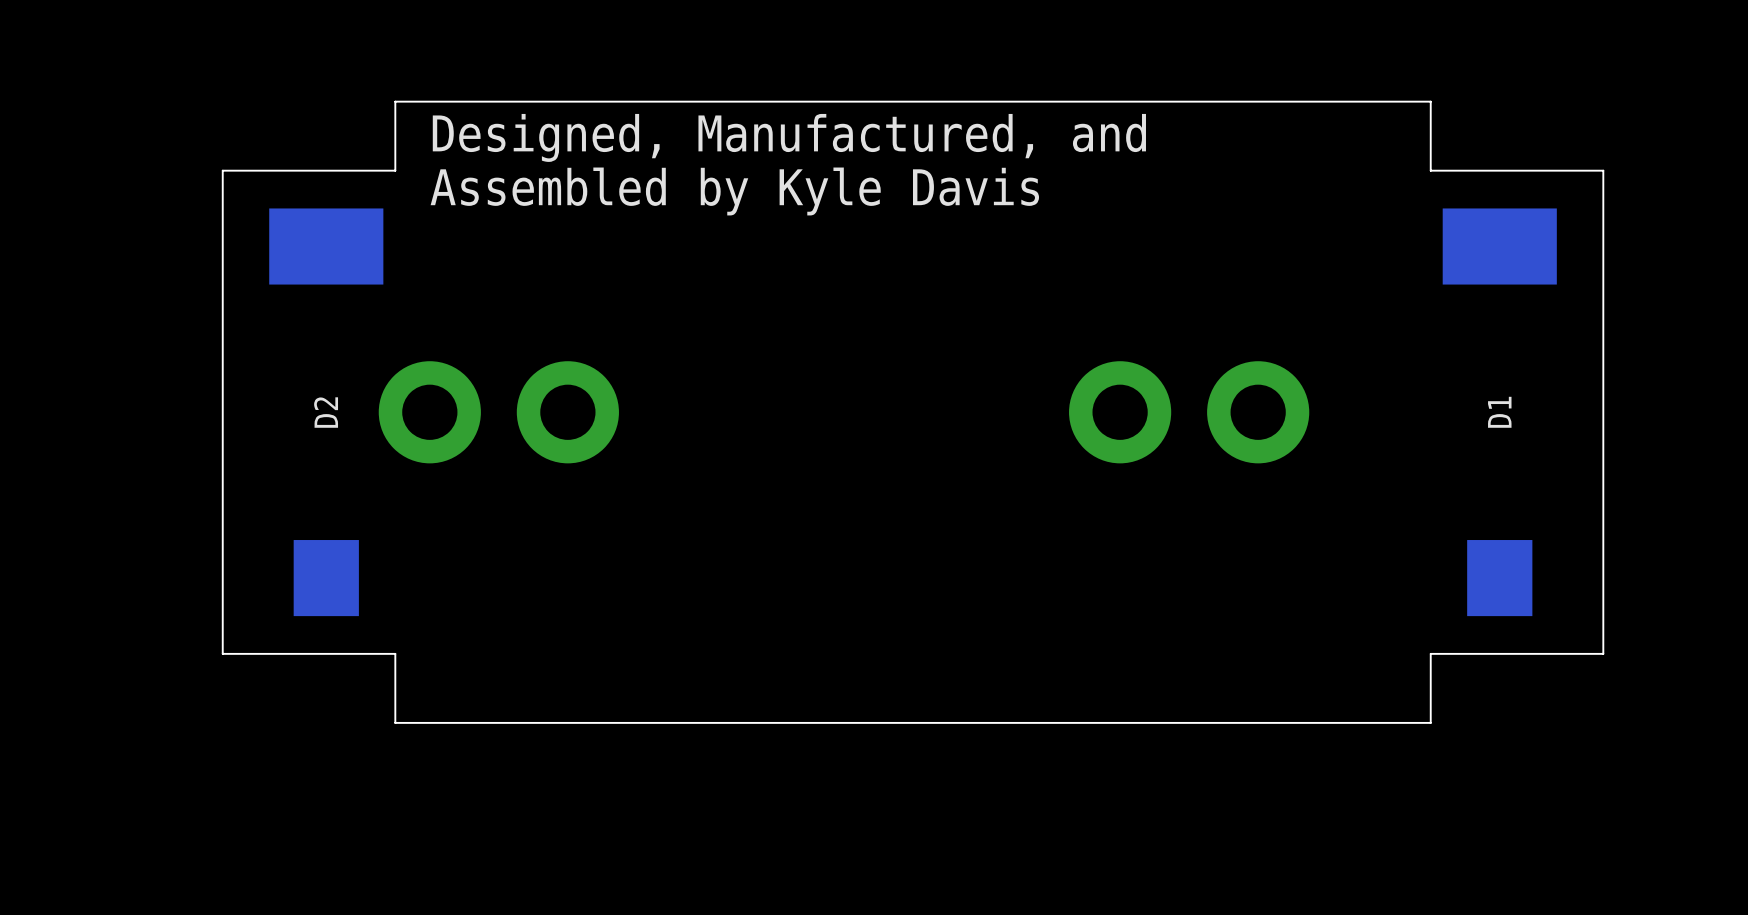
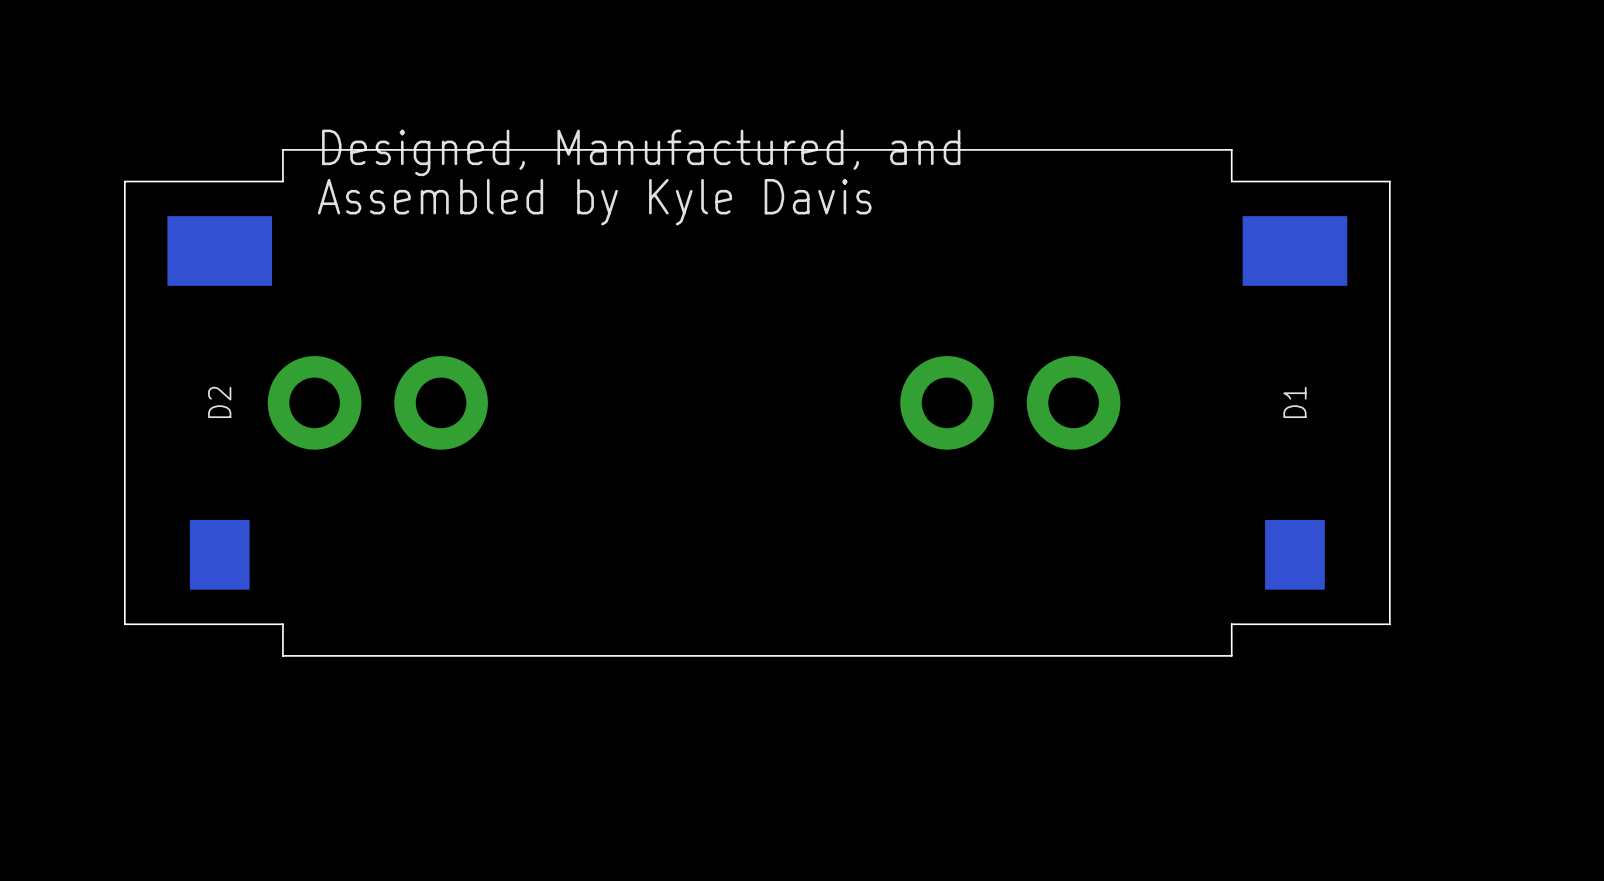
board edge: (1430, 136) (1430, 101) (395, 101) (395, 136) -> (1231, 149) (282, 149)
board edge: (1430, 688) (1430, 722) (395, 722) (395, 688) -> (1231, 655) (282, 655)

